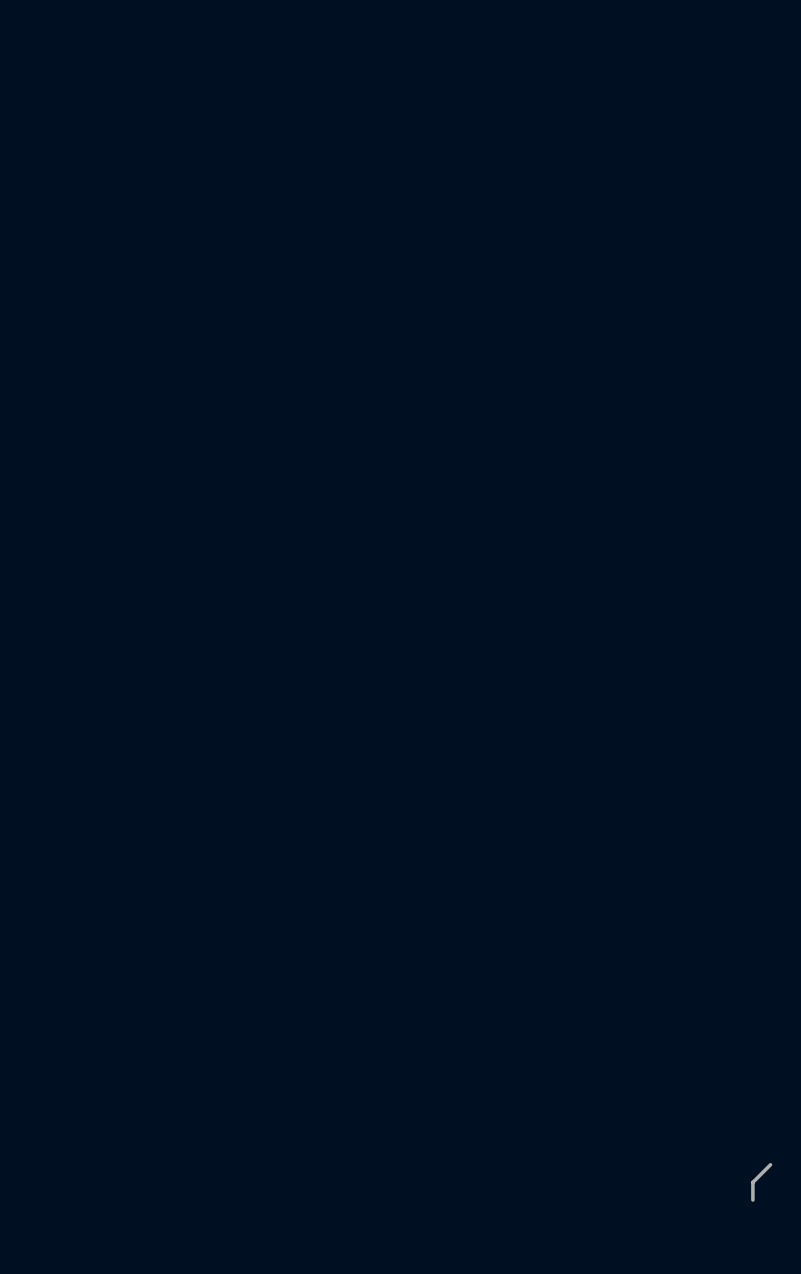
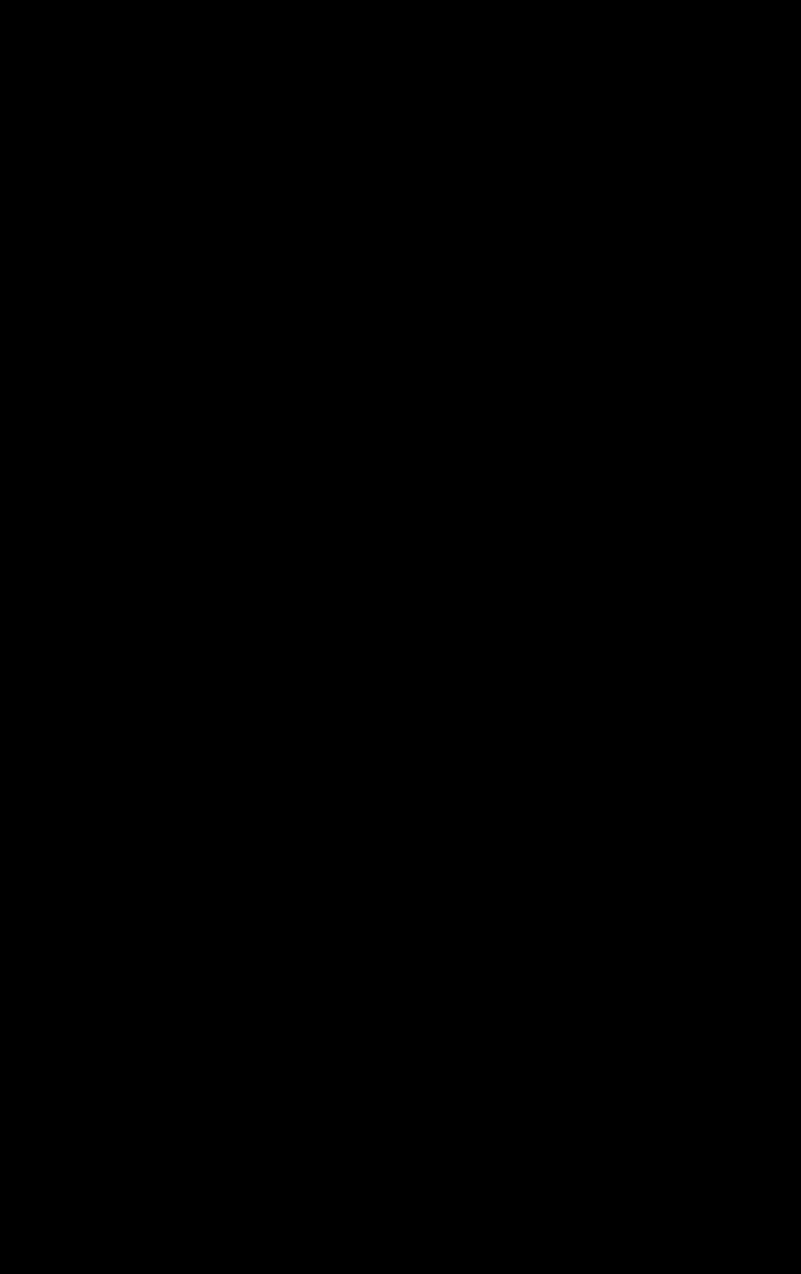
line: (770, 1164) (752, 1182) (752, 1200) -> none

